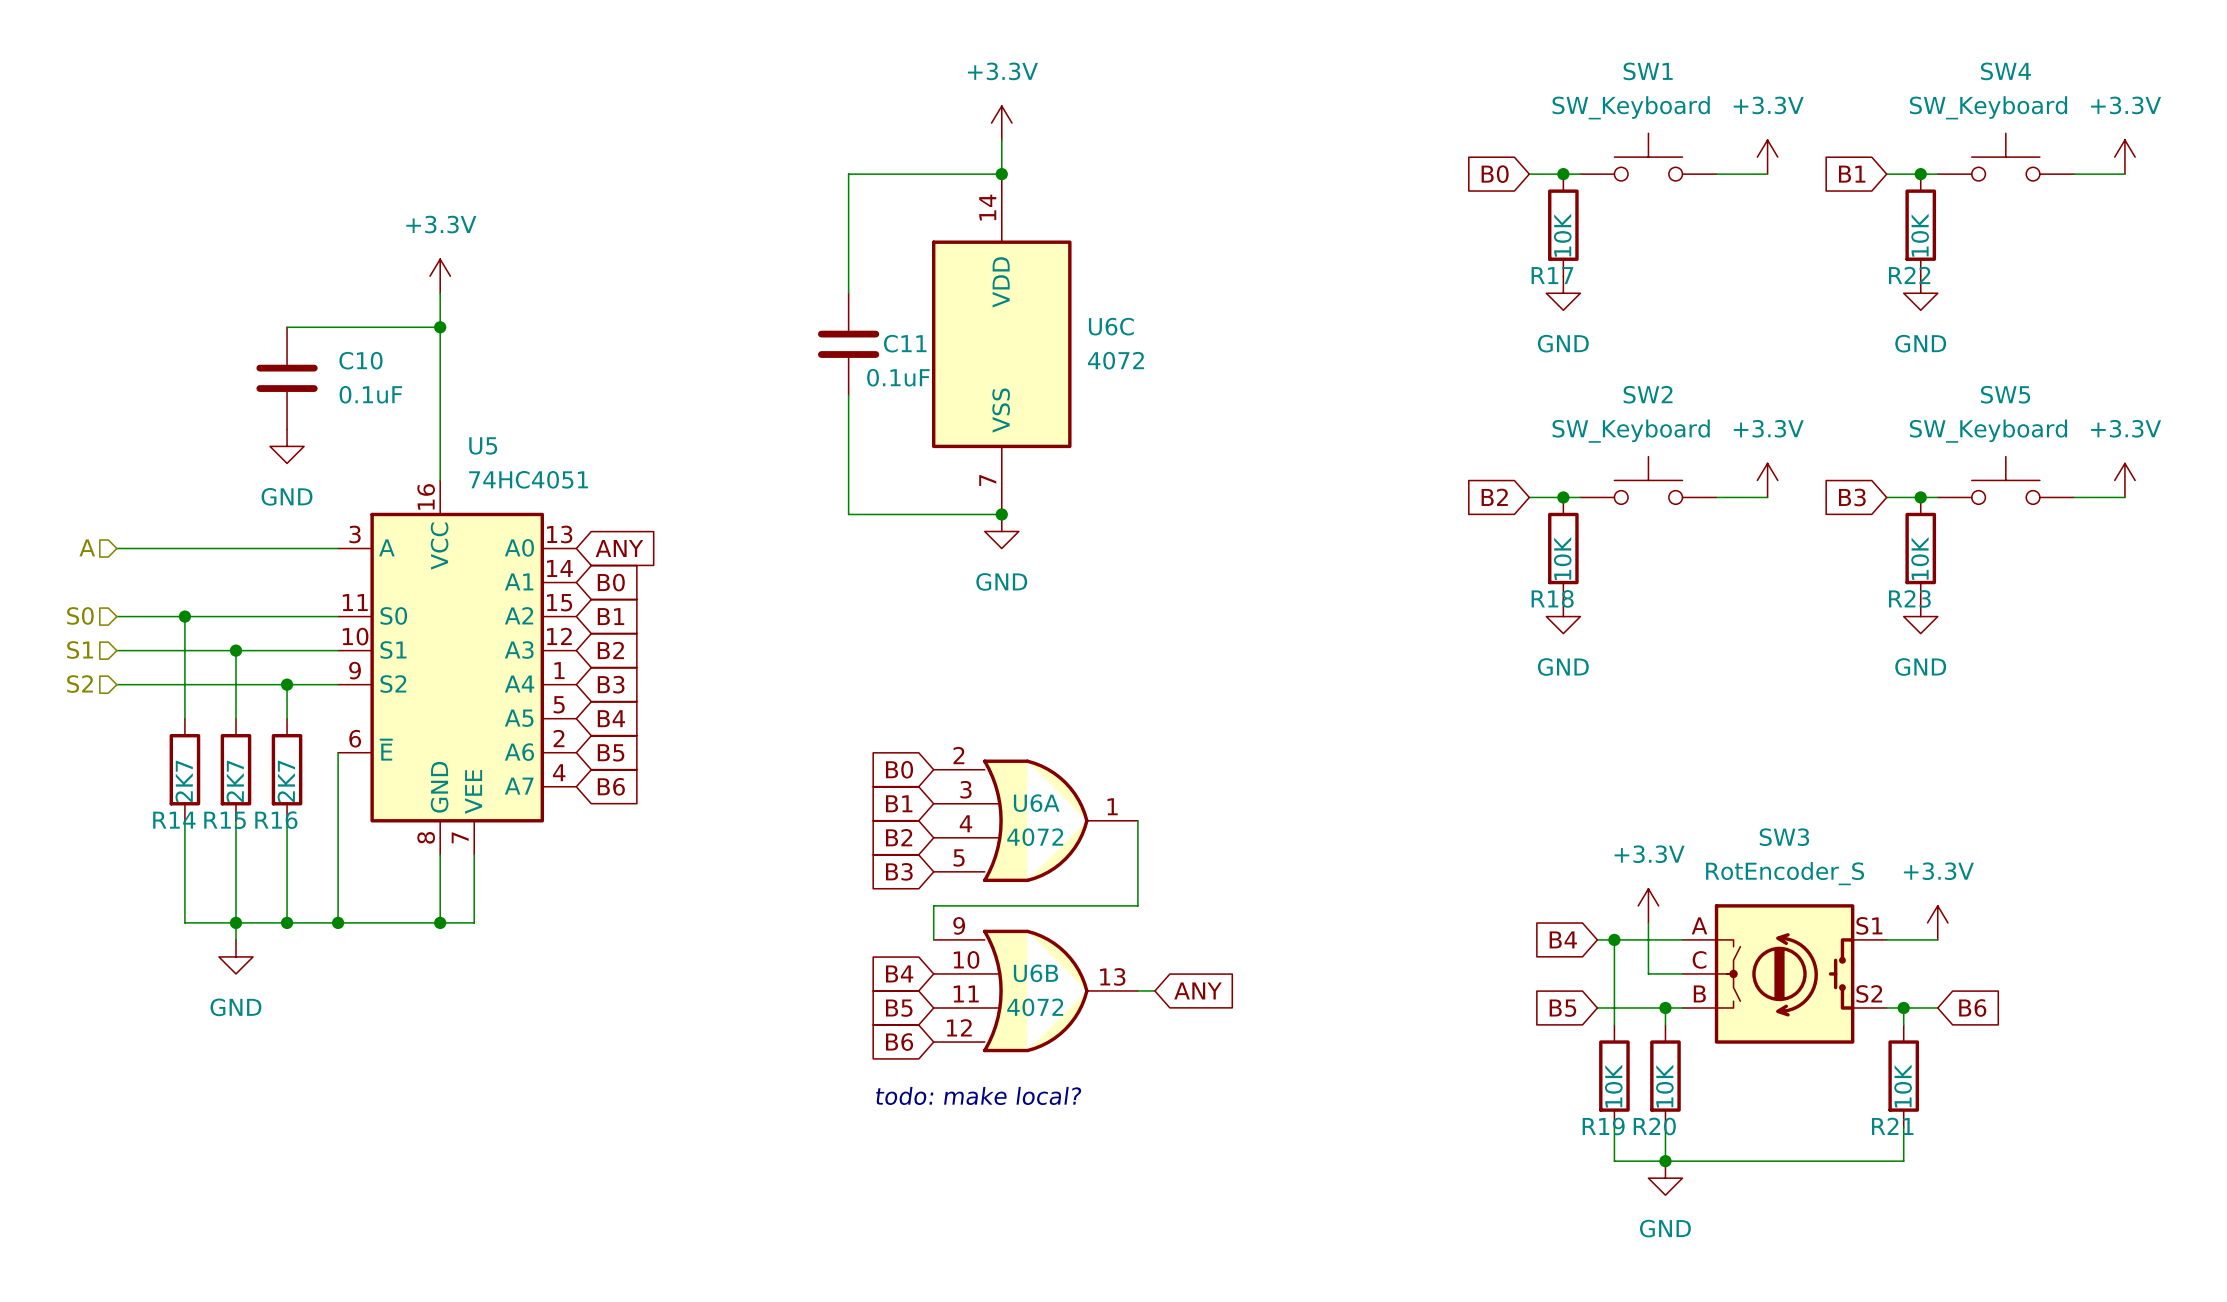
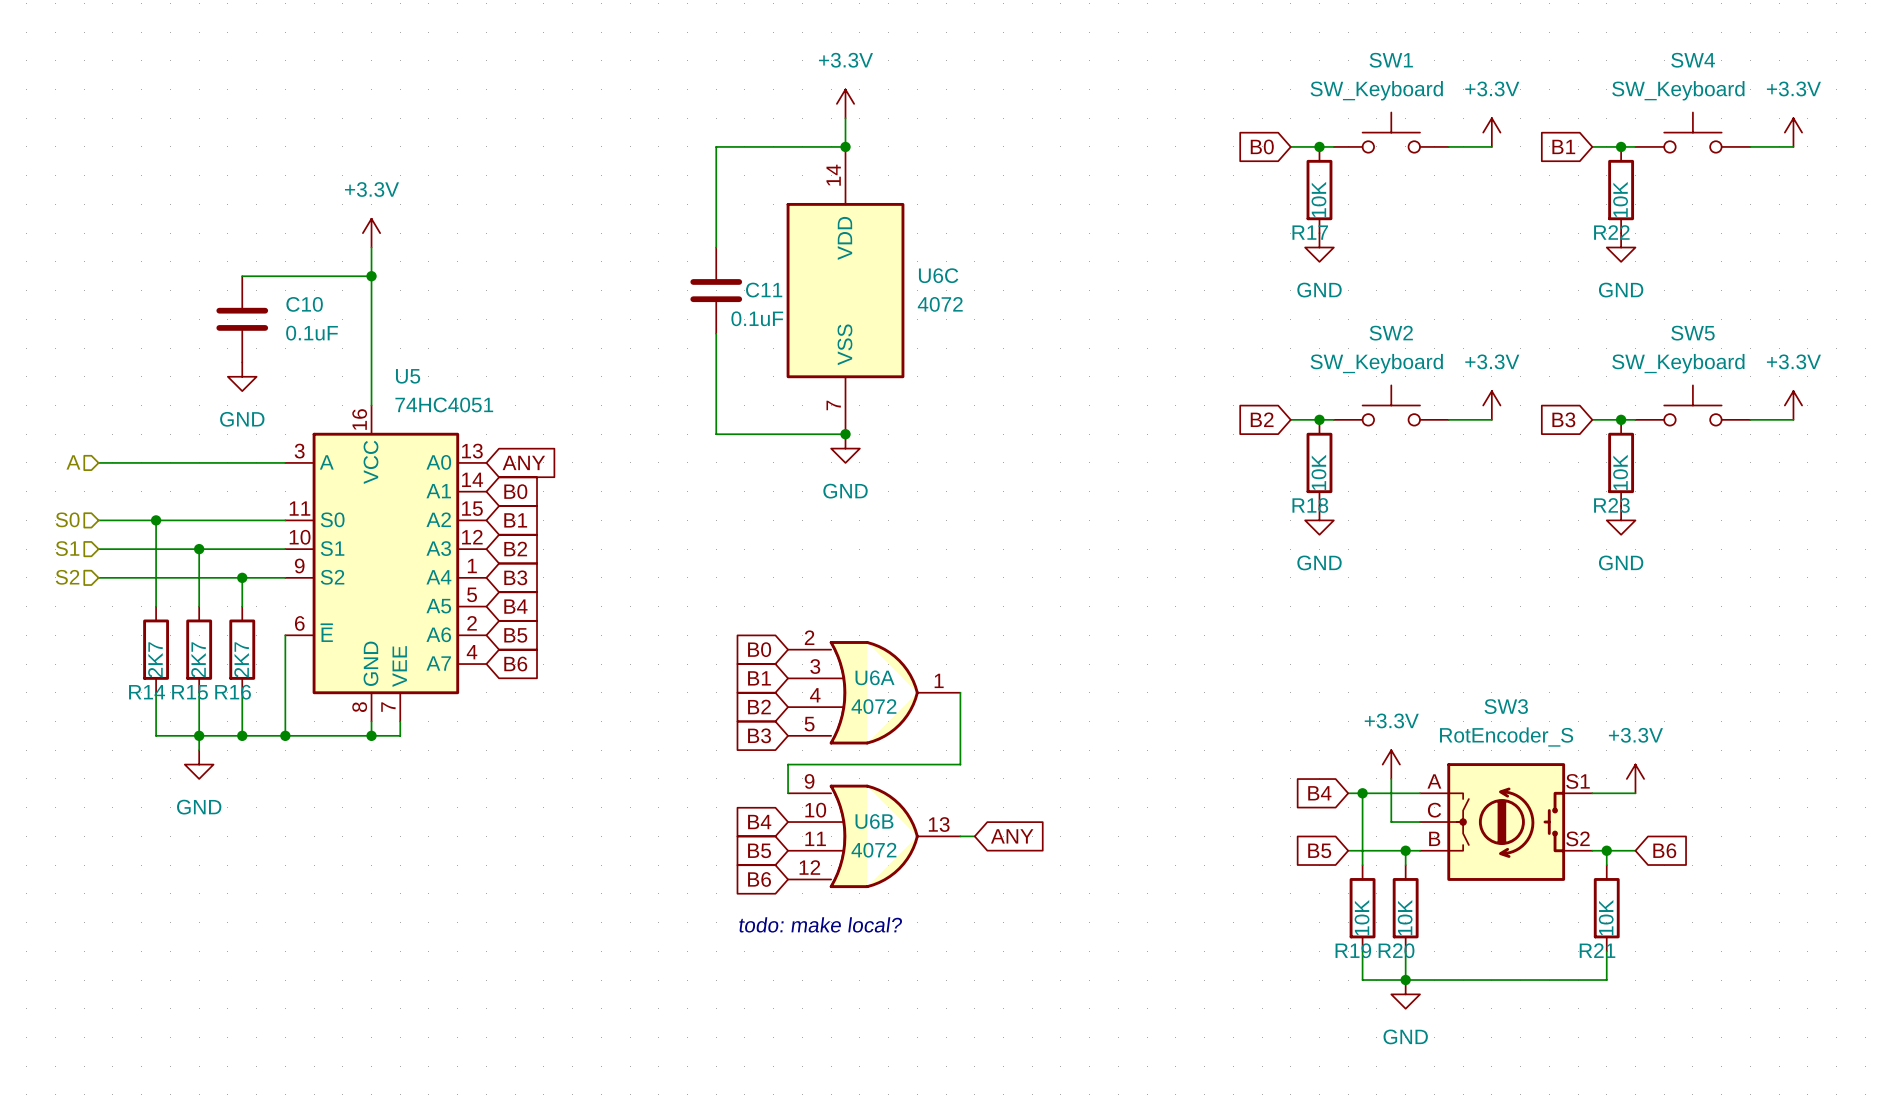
wire: (184, 871) (184, 922) (474, 922) (474, 871) -> (156, 735) (400, 735)
junction: none -> (199, 735)
wire: (287, 871) (287, 922) -> none
junction: none -> (242, 735)
wire: (338, 871) (338, 922) -> none
junction: none -> (285, 735)
wire: (440, 871) (440, 922) -> none
wire: (235, 888) (235, 939) -> none
junction: (235, 922) -> none
junction: (287, 922) -> none
junction: (338, 922) -> none
junction position: (440, 922) -> (371, 735)
power symbol position: GND (235, 956) -> GND (199, 764)

